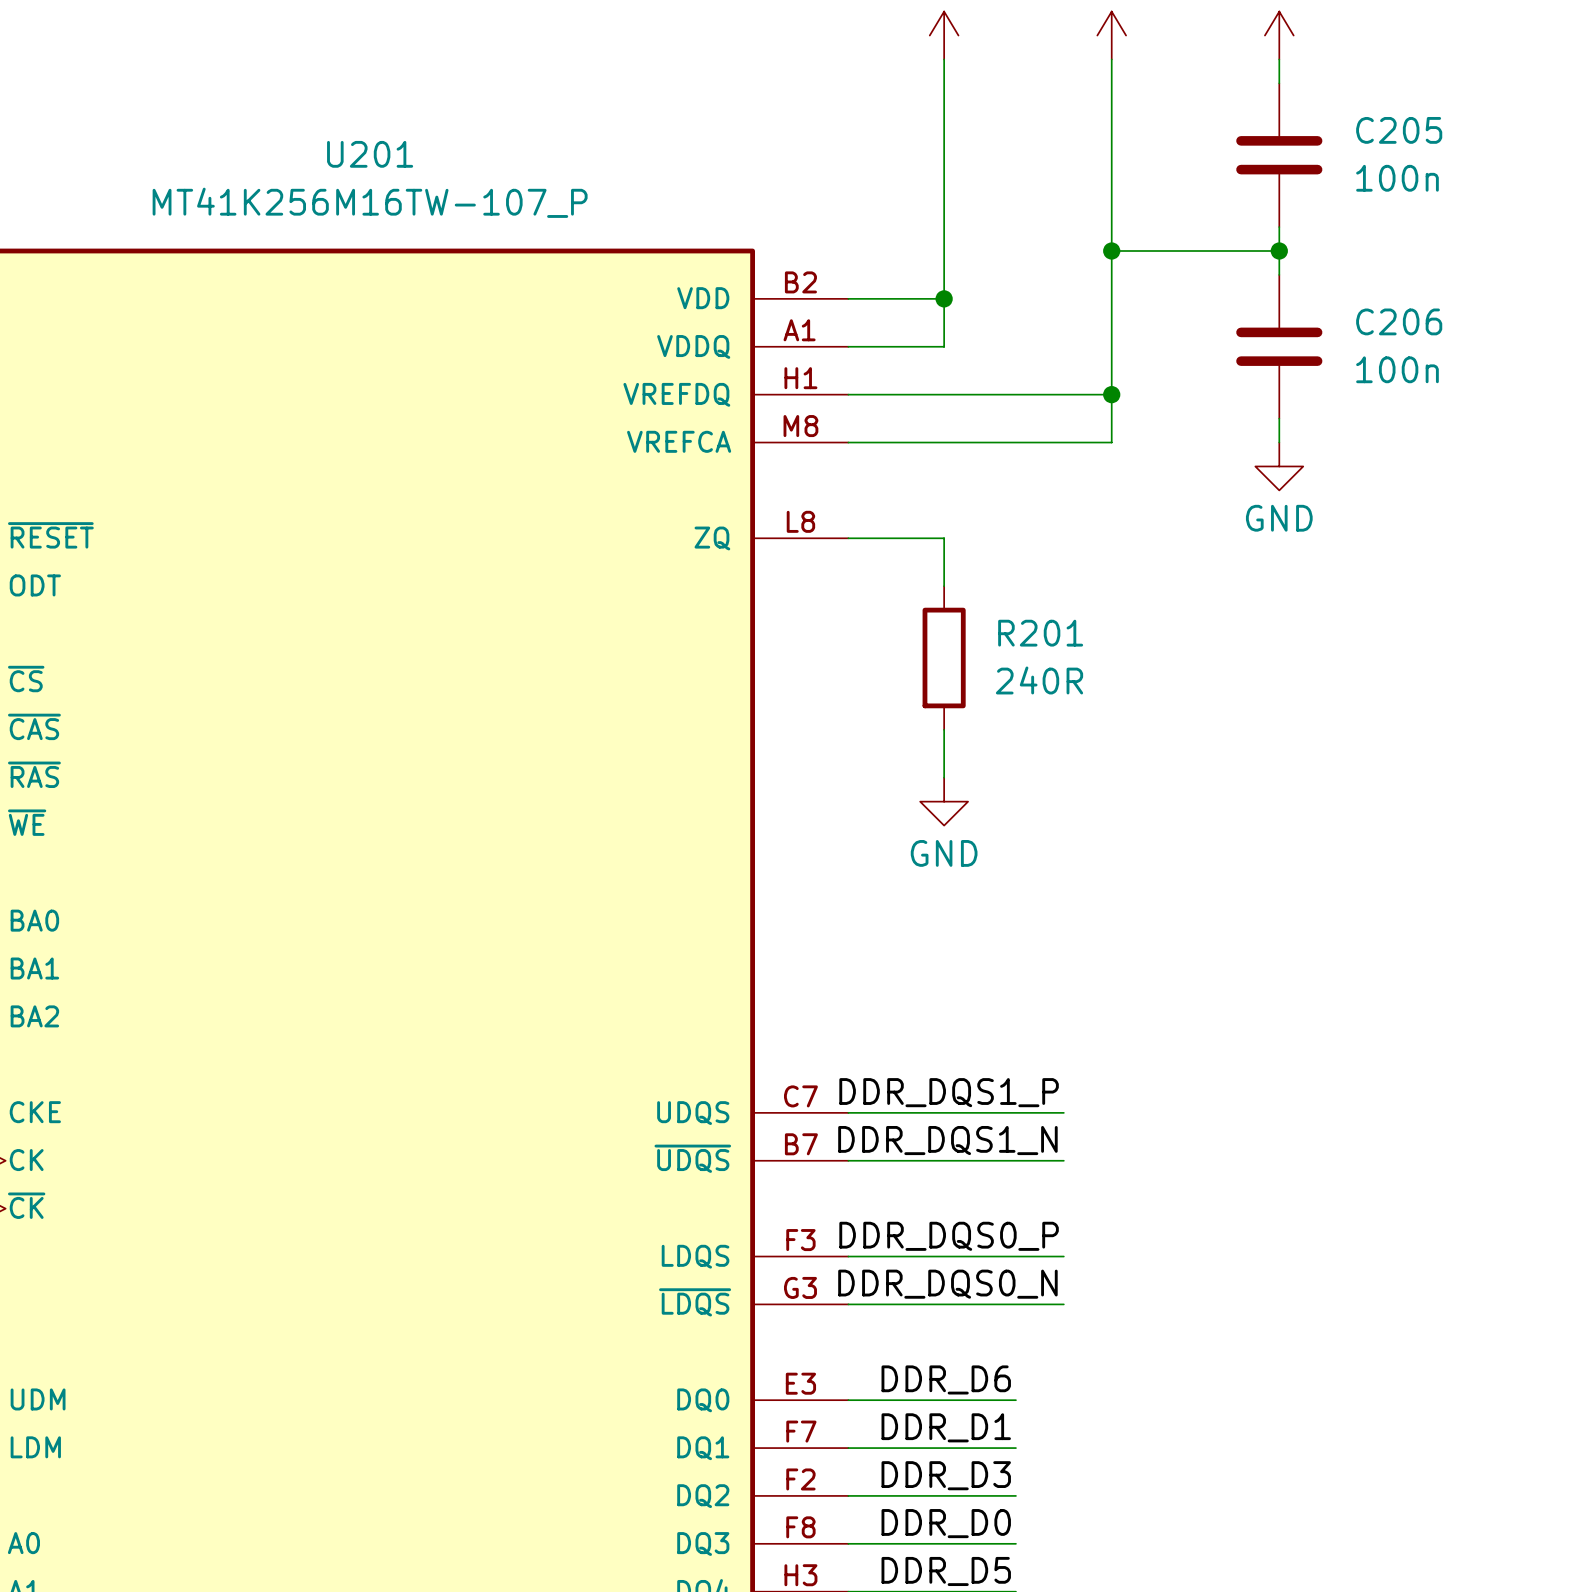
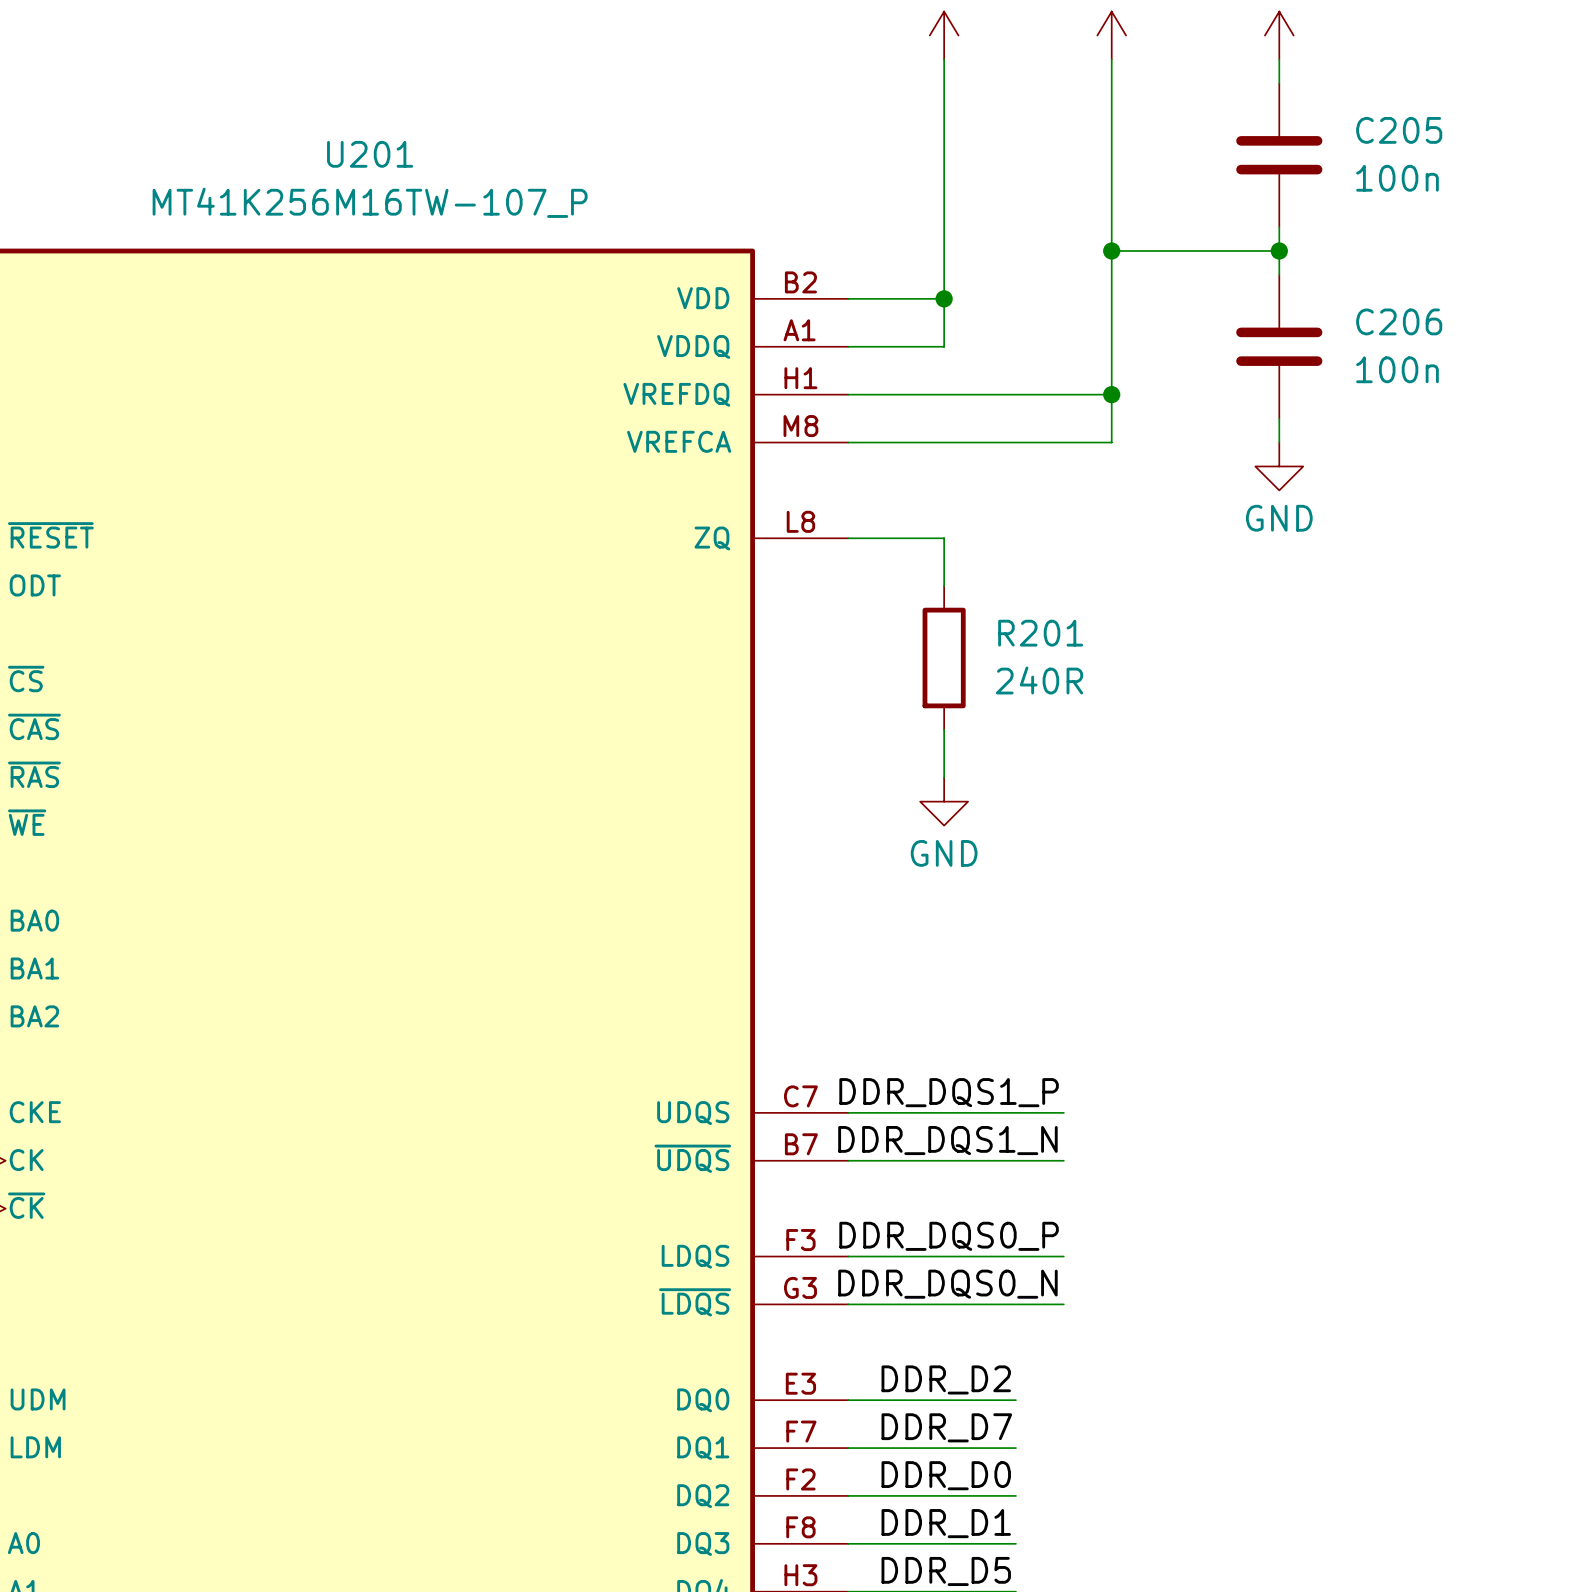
label: DDR_D6 (946, 1379) -> DDR_D2 (946, 1379)
label: DDR_D1 (946, 1427) -> DDR_D7 (946, 1427)
label: DDR_D3 (946, 1475) -> DDR_D0 (946, 1475)
label: DDR_D0 (946, 1523) -> DDR_D1 (946, 1523)

